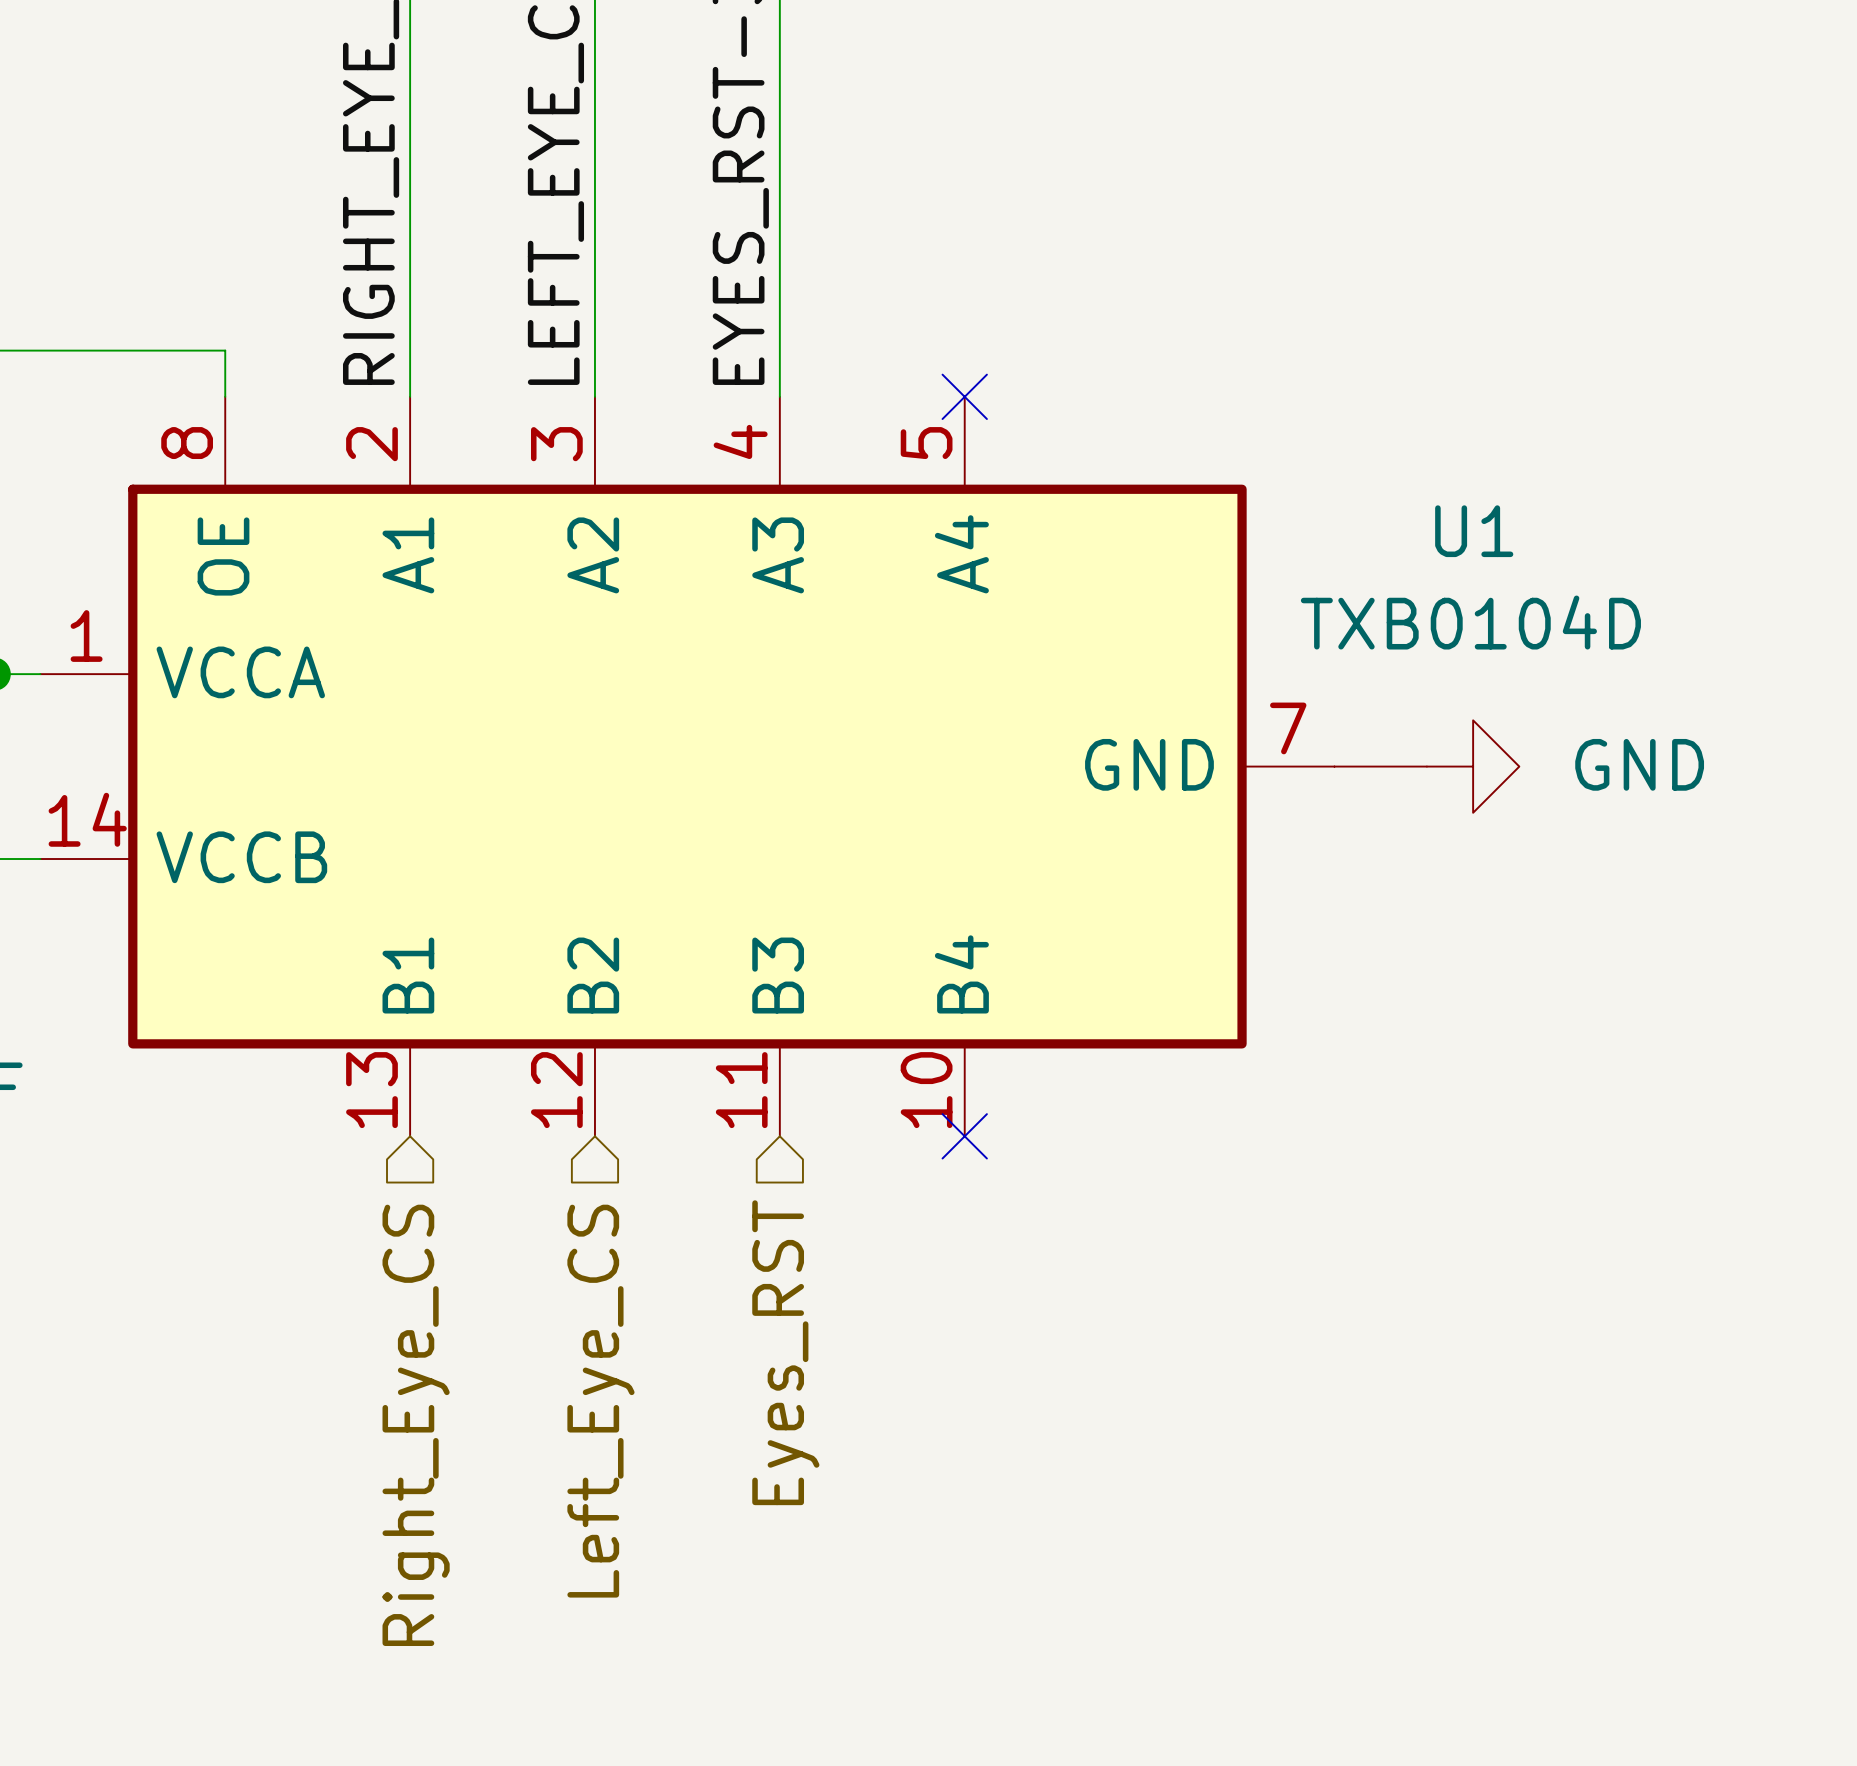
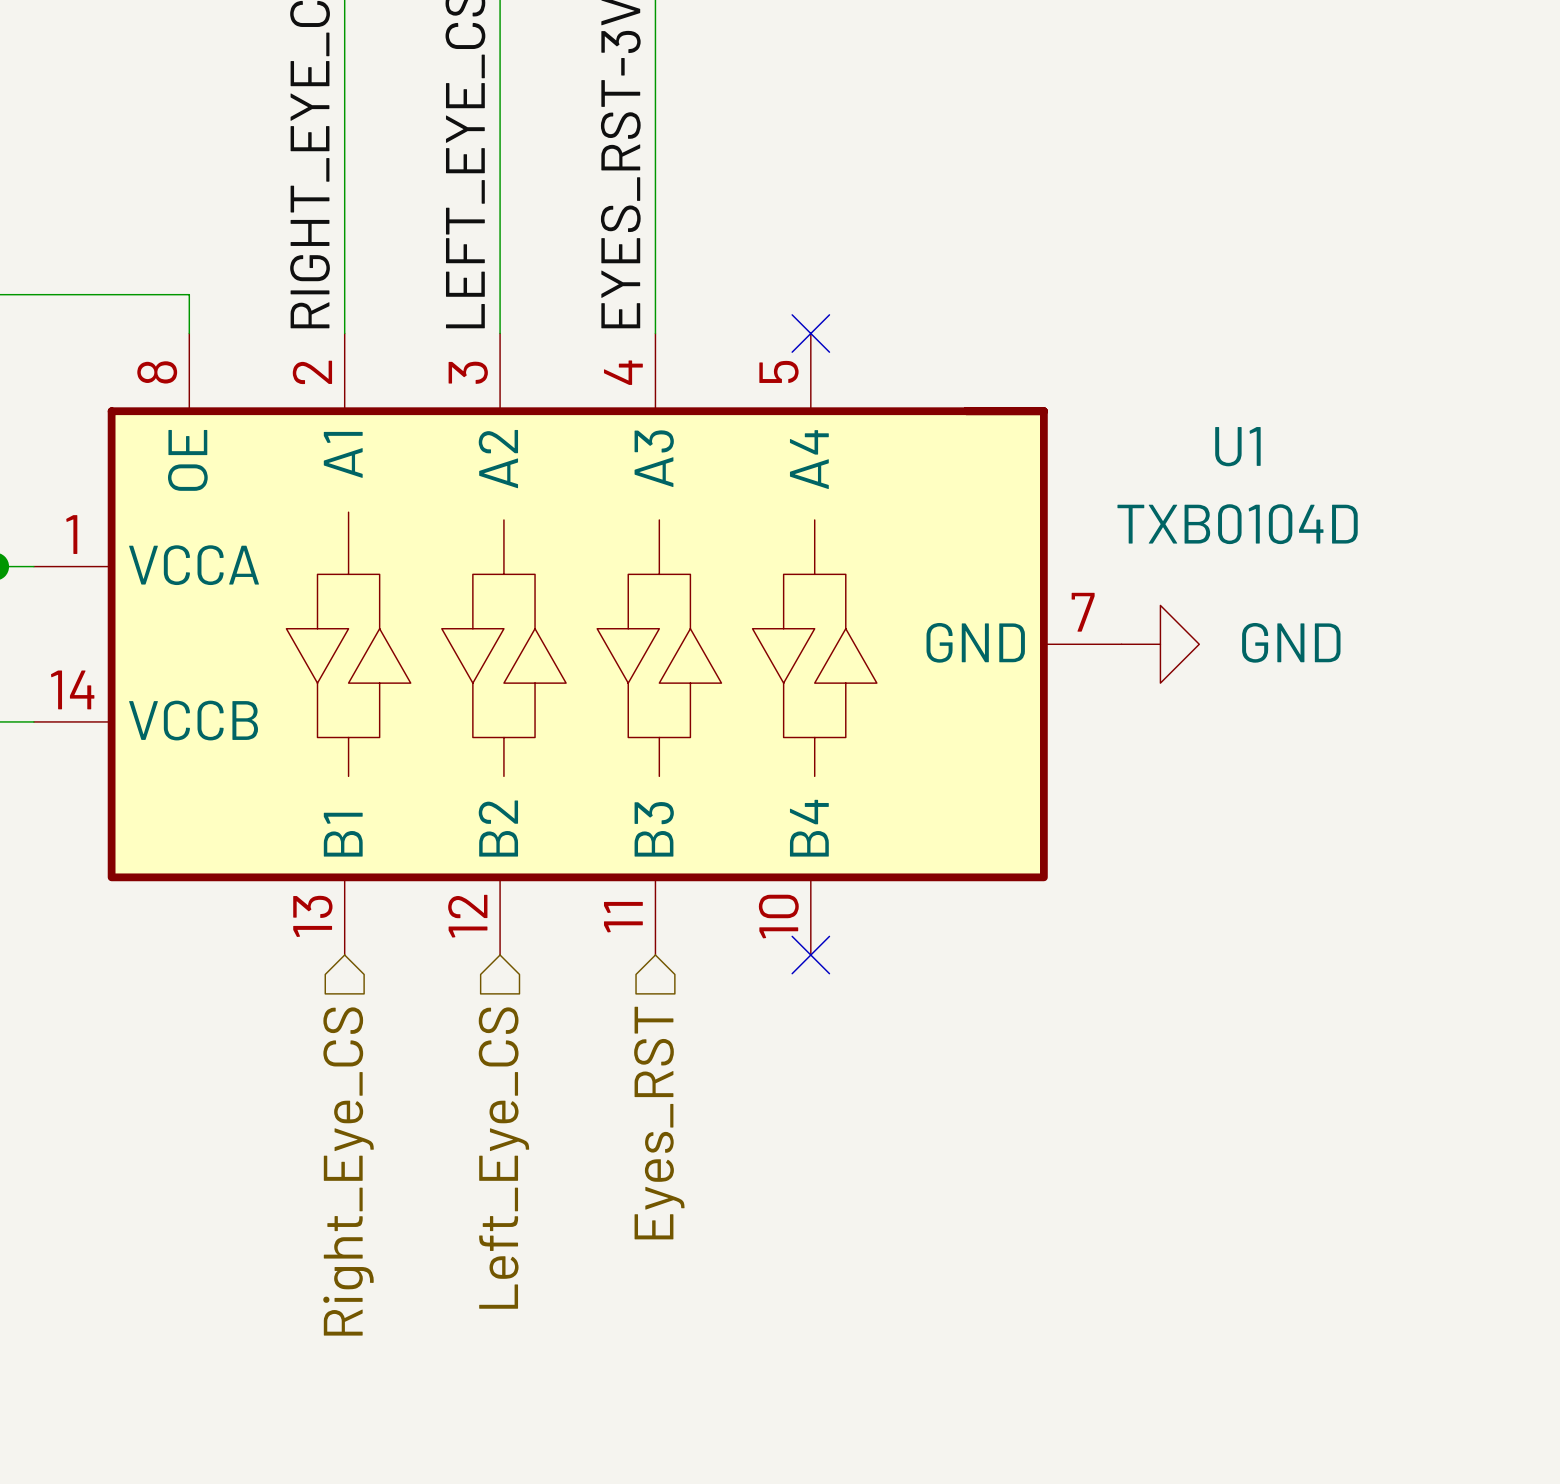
U1 symbol: [40, 396, 1335, 1137] -> [33, 333, 1122, 956]
power symbol: none -> GND (1160, 644)
power symbol: GND (1426, 766) -> none

